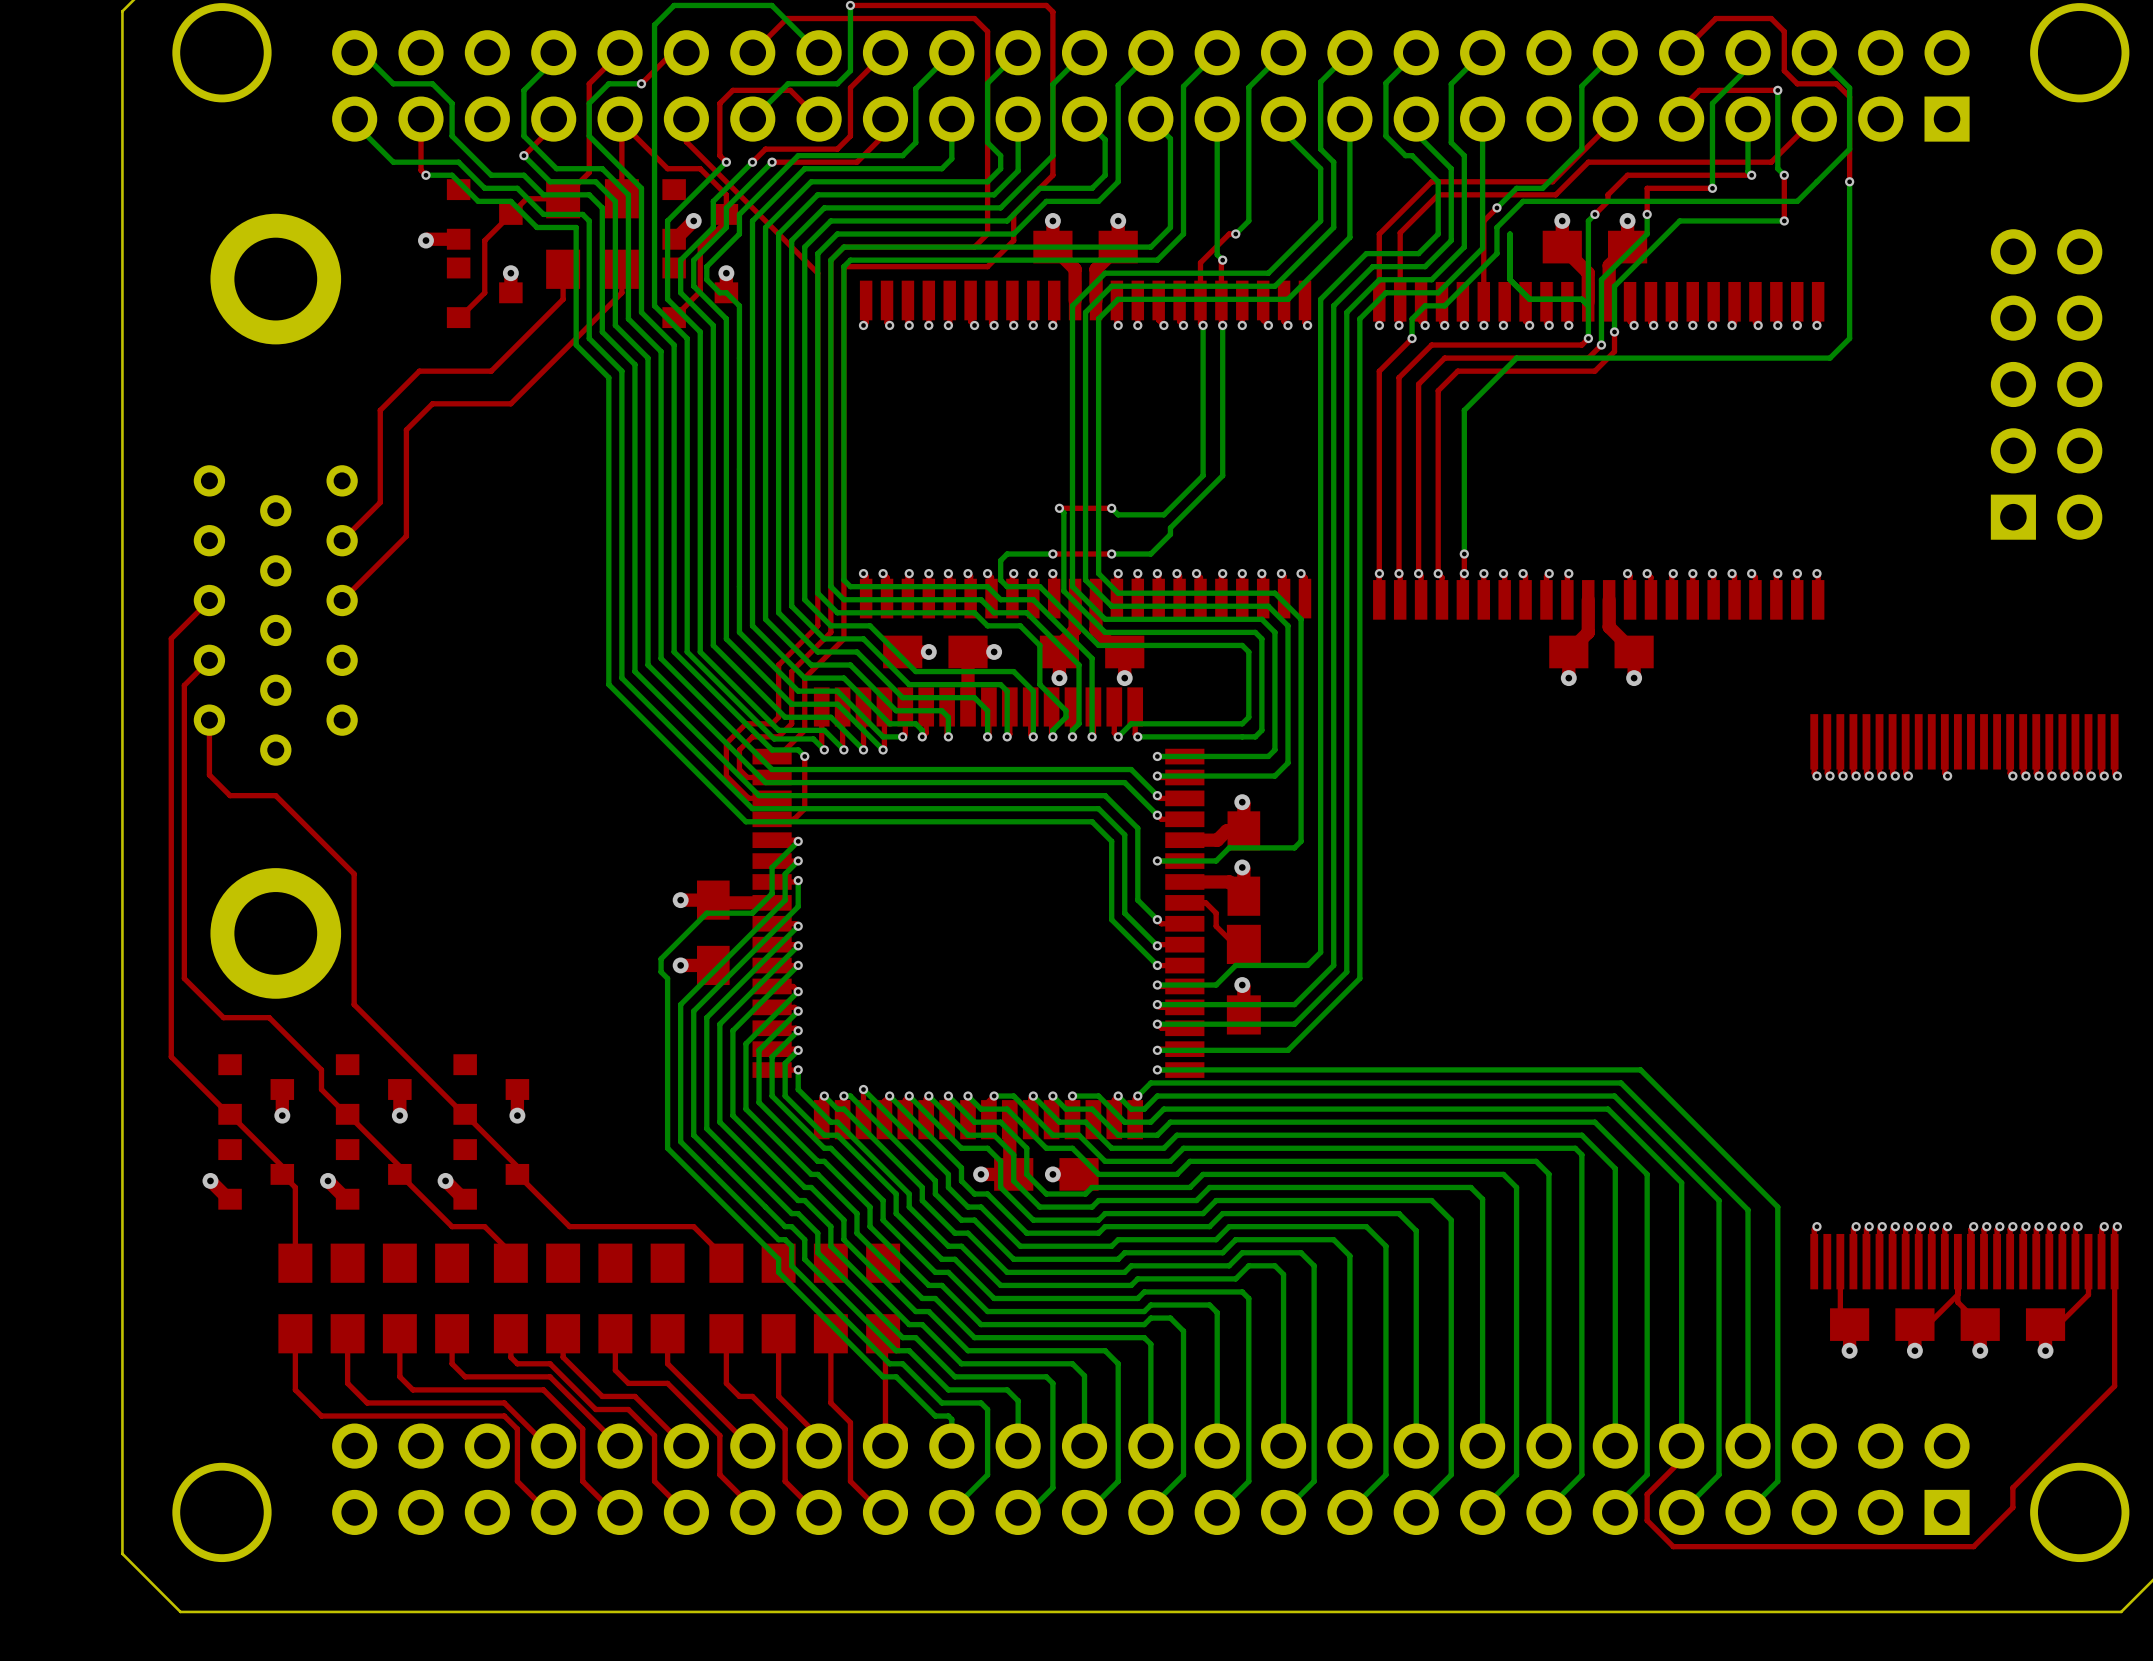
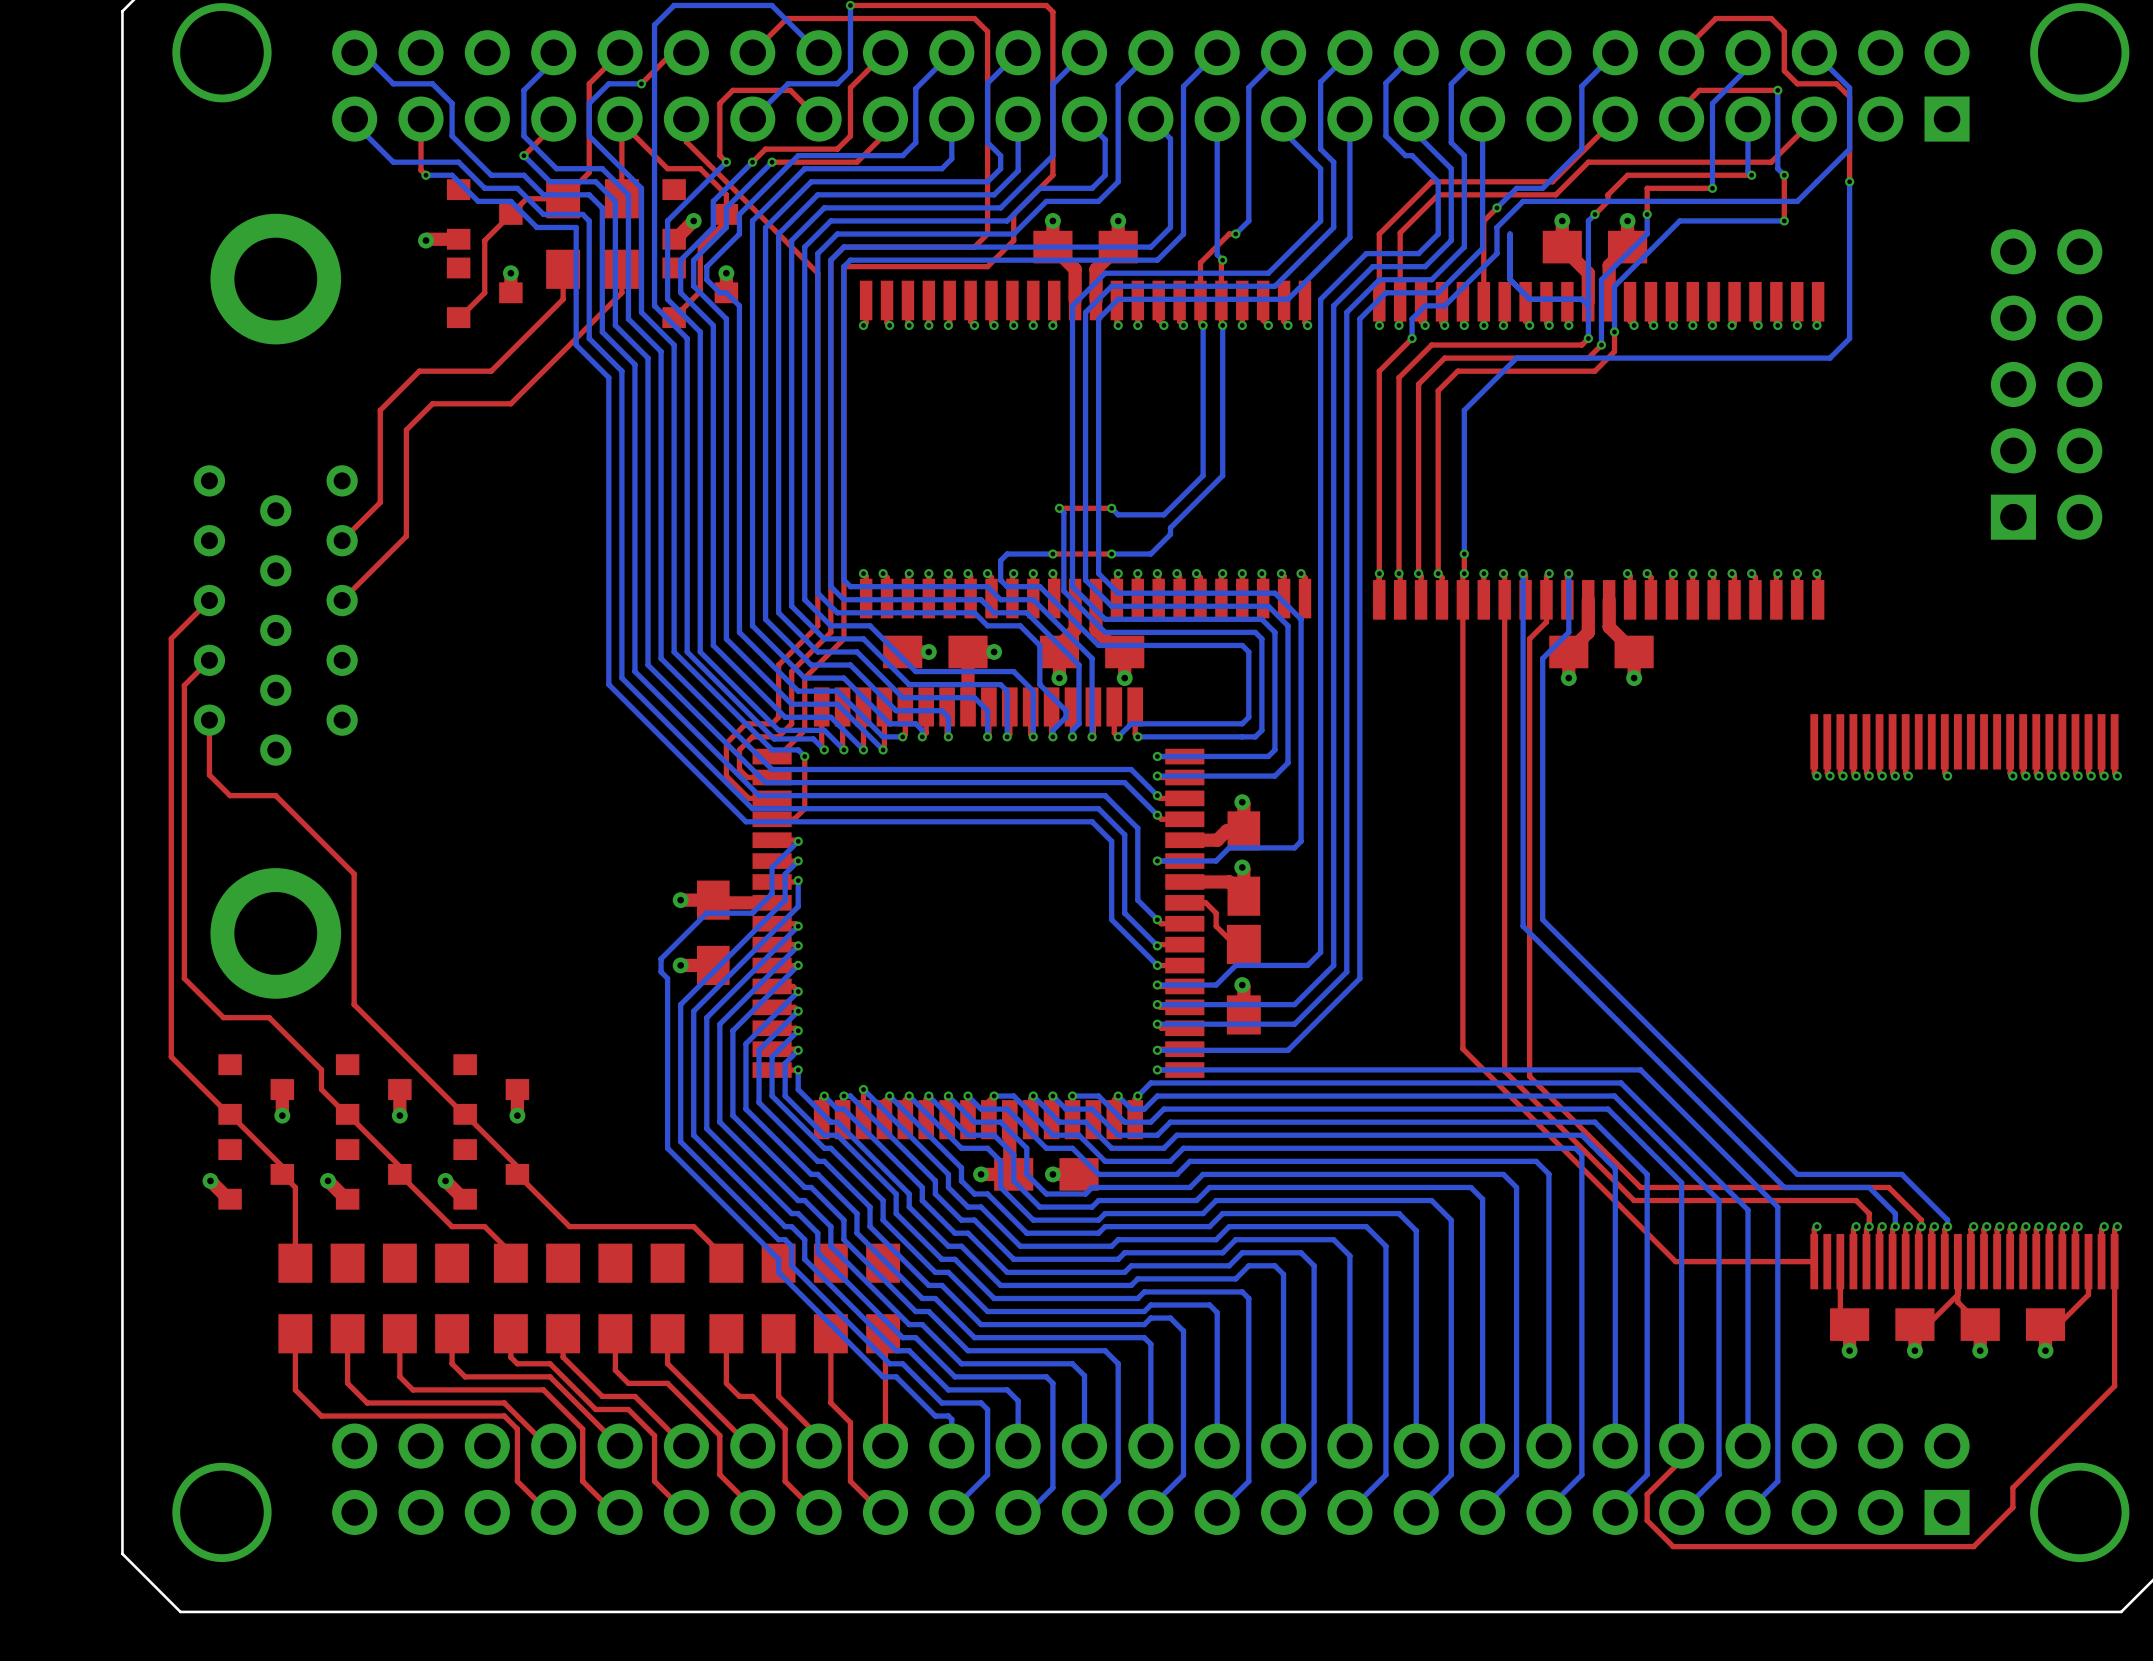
bottom track: none -> (1523, 573) (1523, 926) (1784, 1187) (1869, 1187) (1895, 1213) (1895, 1226)
bottom track: none -> (1568, 573) (1568, 632) (1542, 658) (1542, 919) (1797, 1174) (1901, 1174) (1947, 1220) (1947, 1226)
top track: none -> (1462, 599) (1462, 1048) (1675, 1261) (1814, 1261)
top track: none -> (1504, 599) (1504, 1071) (1634, 1200) (1856, 1200) (1869, 1213) (1869, 1226)
top track: none -> (1546, 599) (1546, 622) (1529, 638) (1529, 1076) (1640, 1187) (1888, 1187) (1921, 1220) (1921, 1226)

